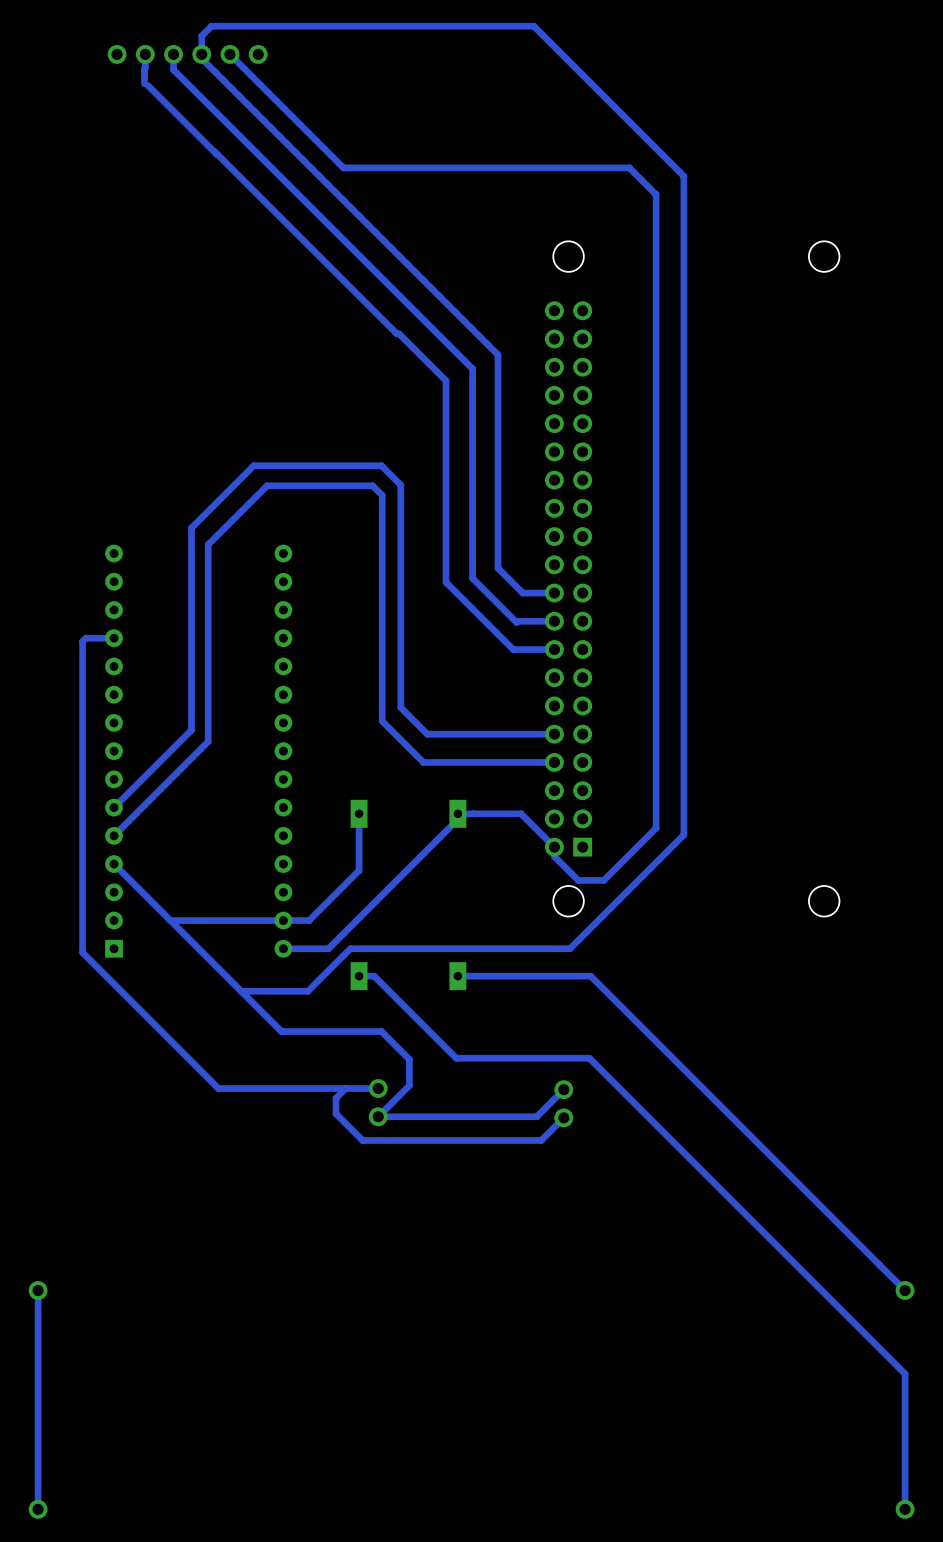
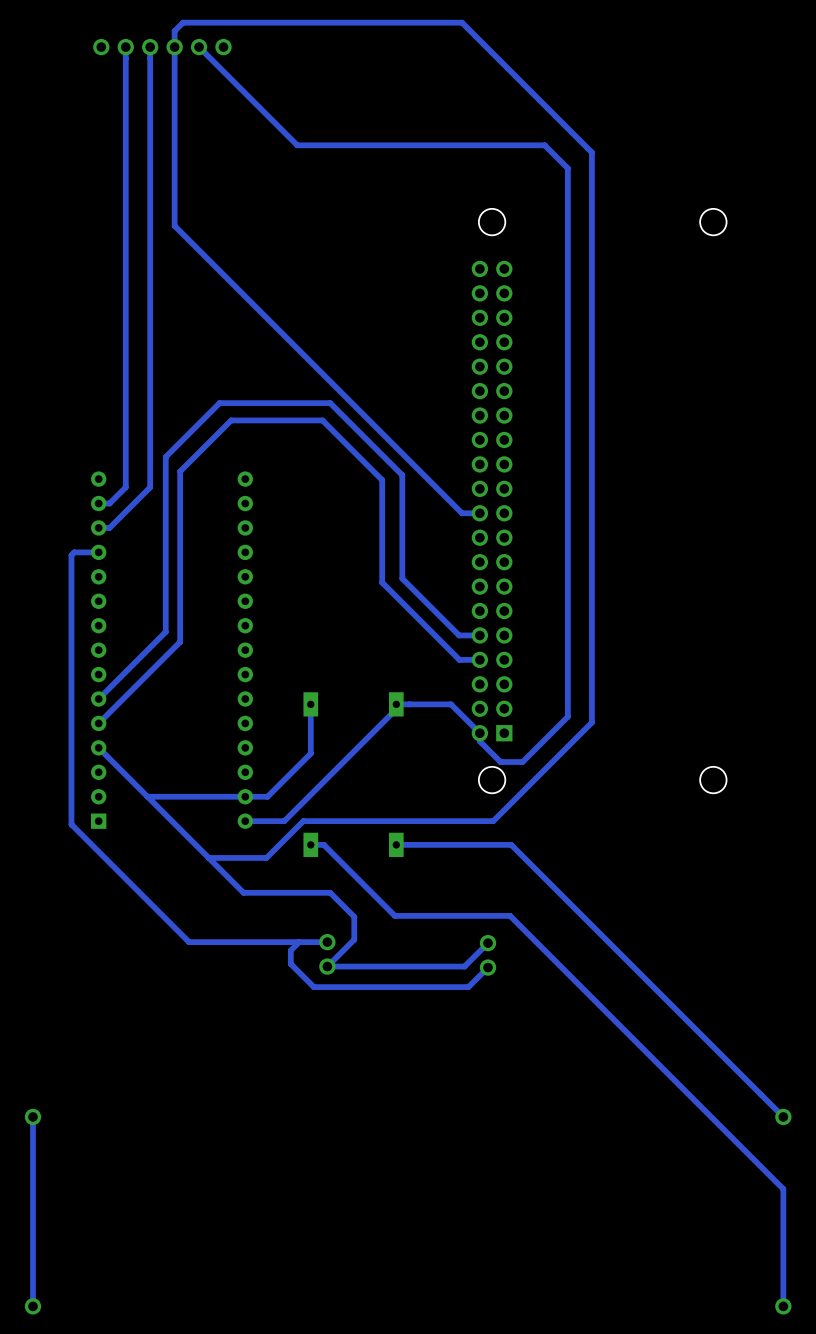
track: (201, 58) (497, 354) (497, 568) (522, 593) (533, 593) -> (174, 50) (174, 225) (462, 513)
track: (145, 67) (144, 83) (147, 85) -> (125, 58) (125, 487) (109, 503) (98, 503)
track: (173, 69) (472, 368) (472, 578) (516, 622) (554, 621) -> (150, 60) (150, 487) (109, 527) (98, 527)
track: (147, 85) (217, 154) -> none
track: (147, 85) (446, 380) (446, 582) (513, 649) (554, 649) -> none
track: (400, 485) (400, 707) (427, 734) (530, 734) -> (346, 419) (402, 475) (402, 578) (459, 635)
track: (382, 495) (382, 721) (423, 762) (530, 762) -> (330, 428) (382, 480) (382, 582) (459, 659)

